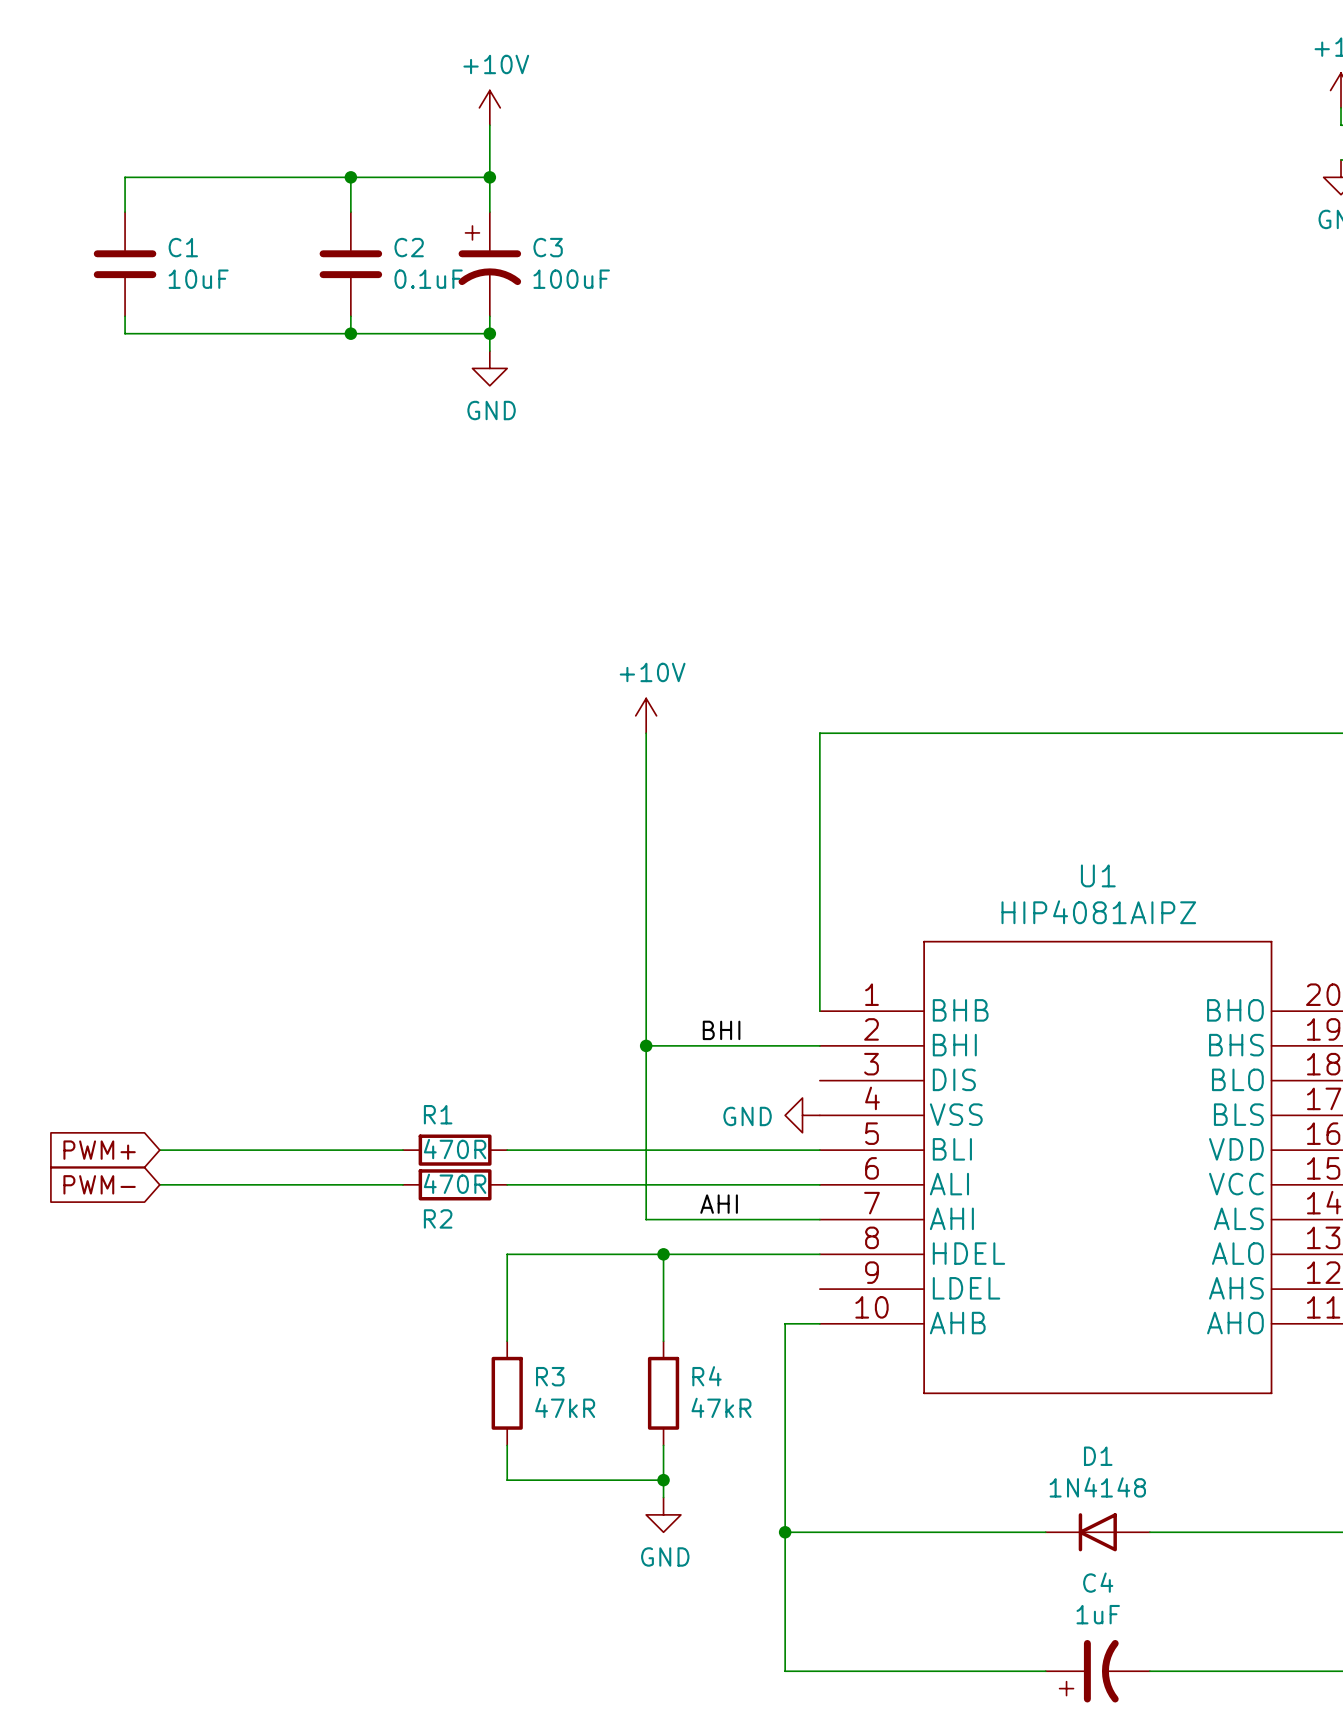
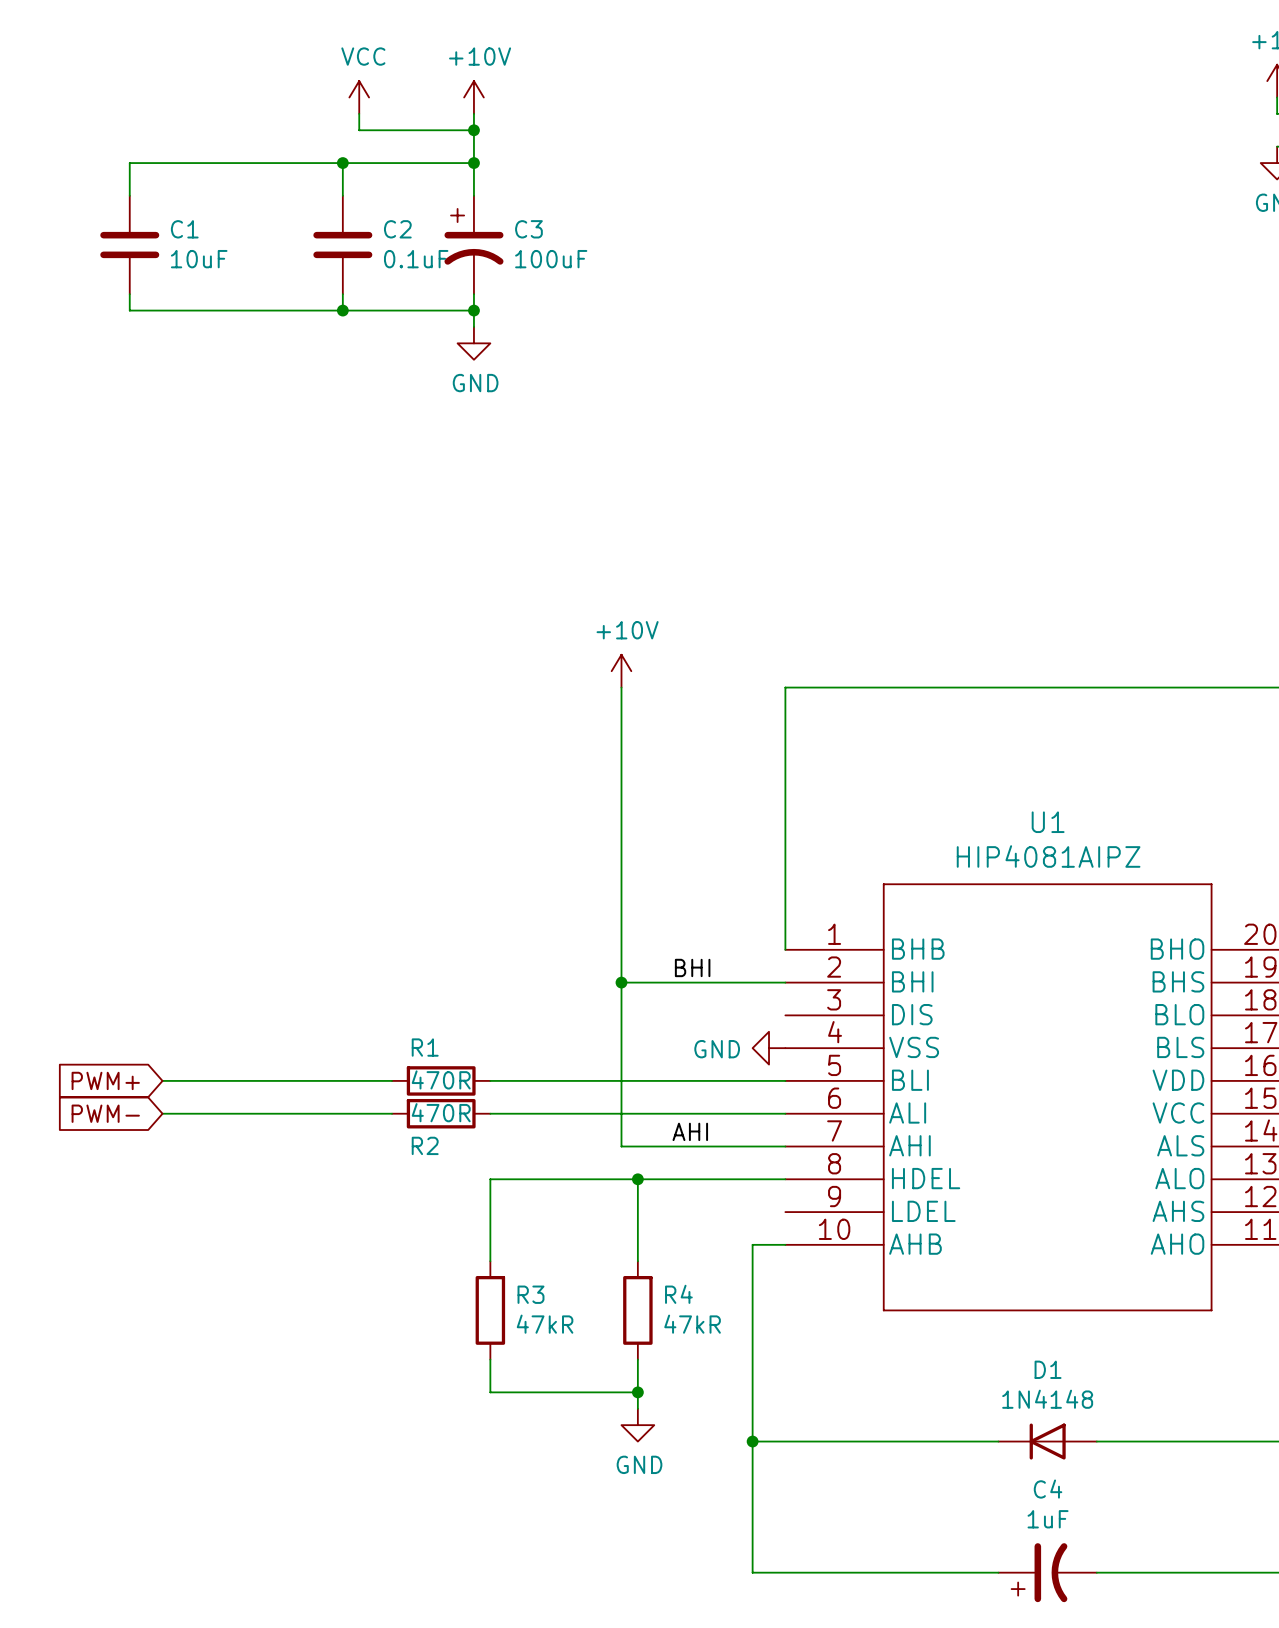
power symbol: none -> VCC (359, 97)
wire: none -> (359, 113) (359, 130) (473, 130)
junction: none -> (473, 130)

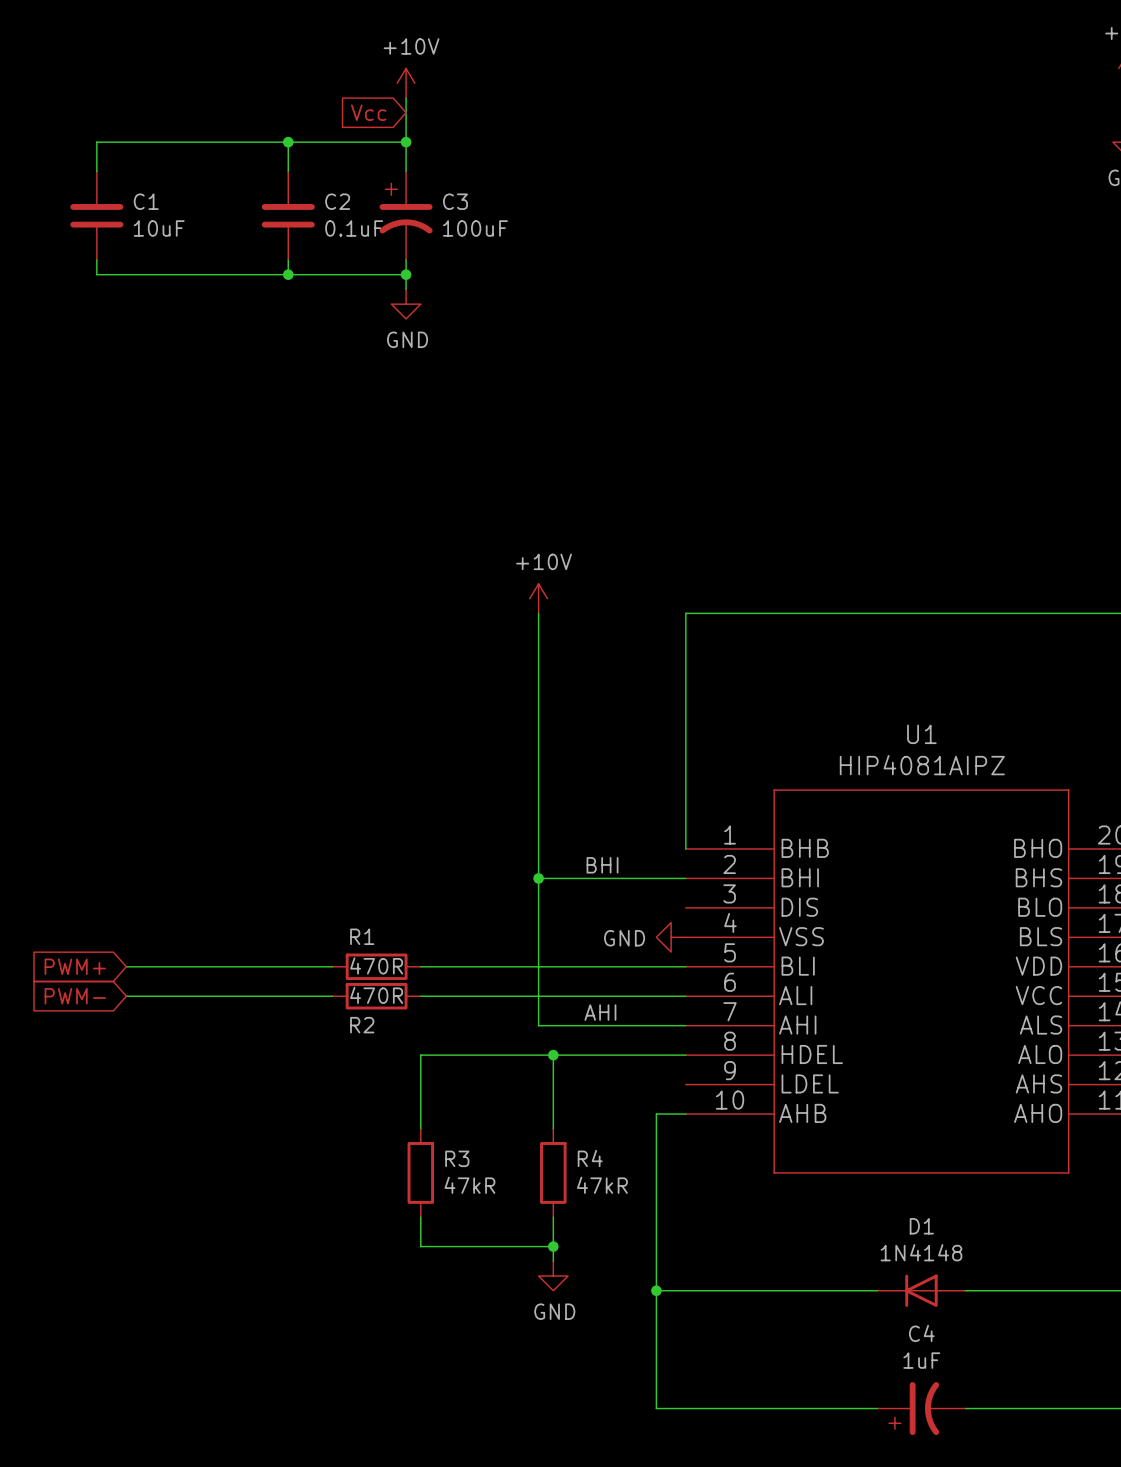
power symbol: VCC (359, 97) -> none
wire: (359, 113) (359, 130) (473, 130) -> none
global label: none -> Vcc (368, 112)
junction: (473, 130) -> none

